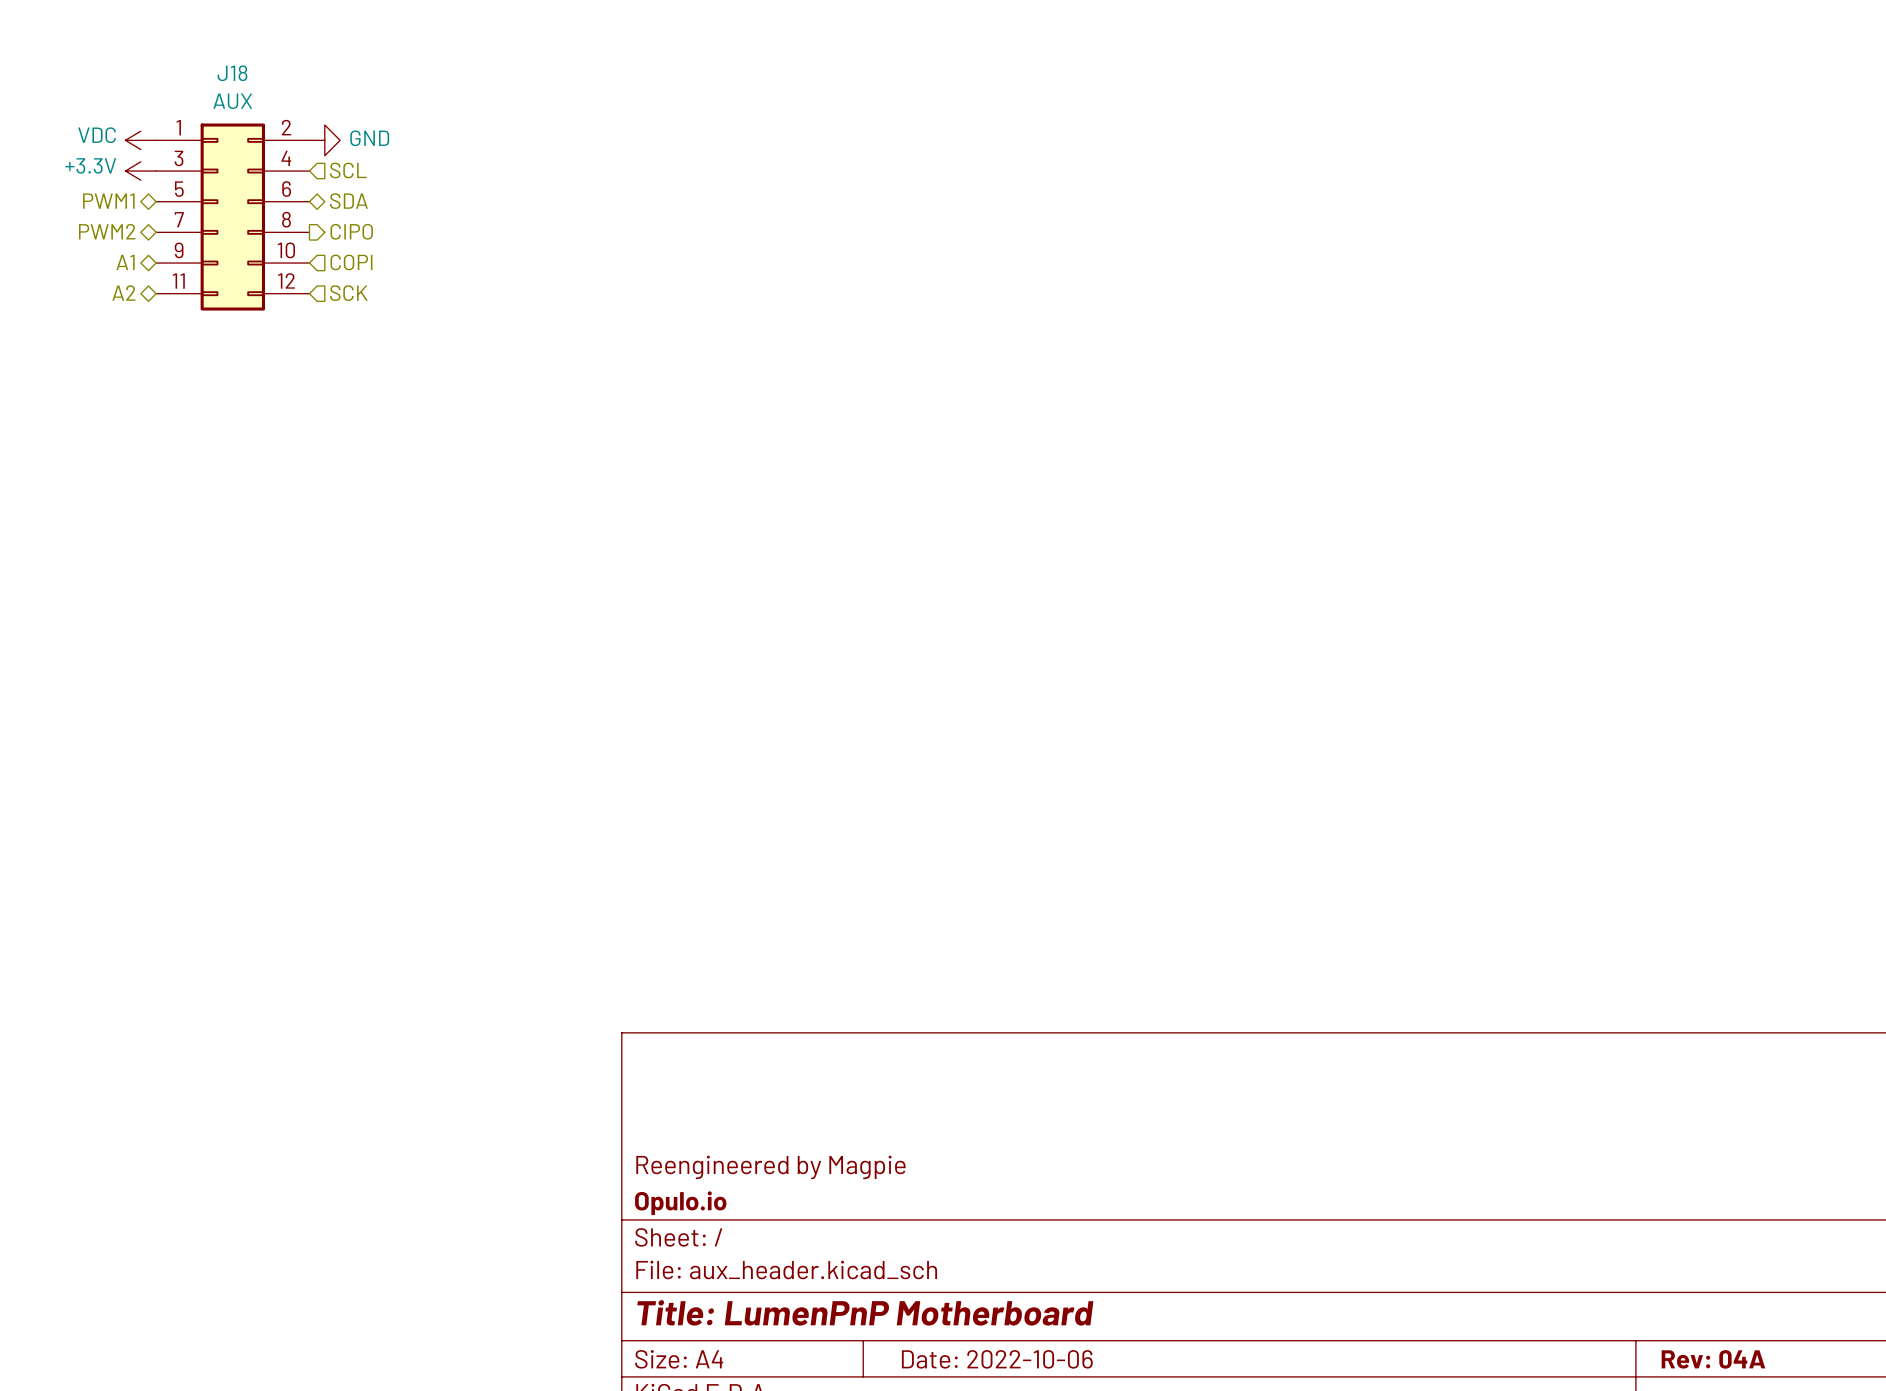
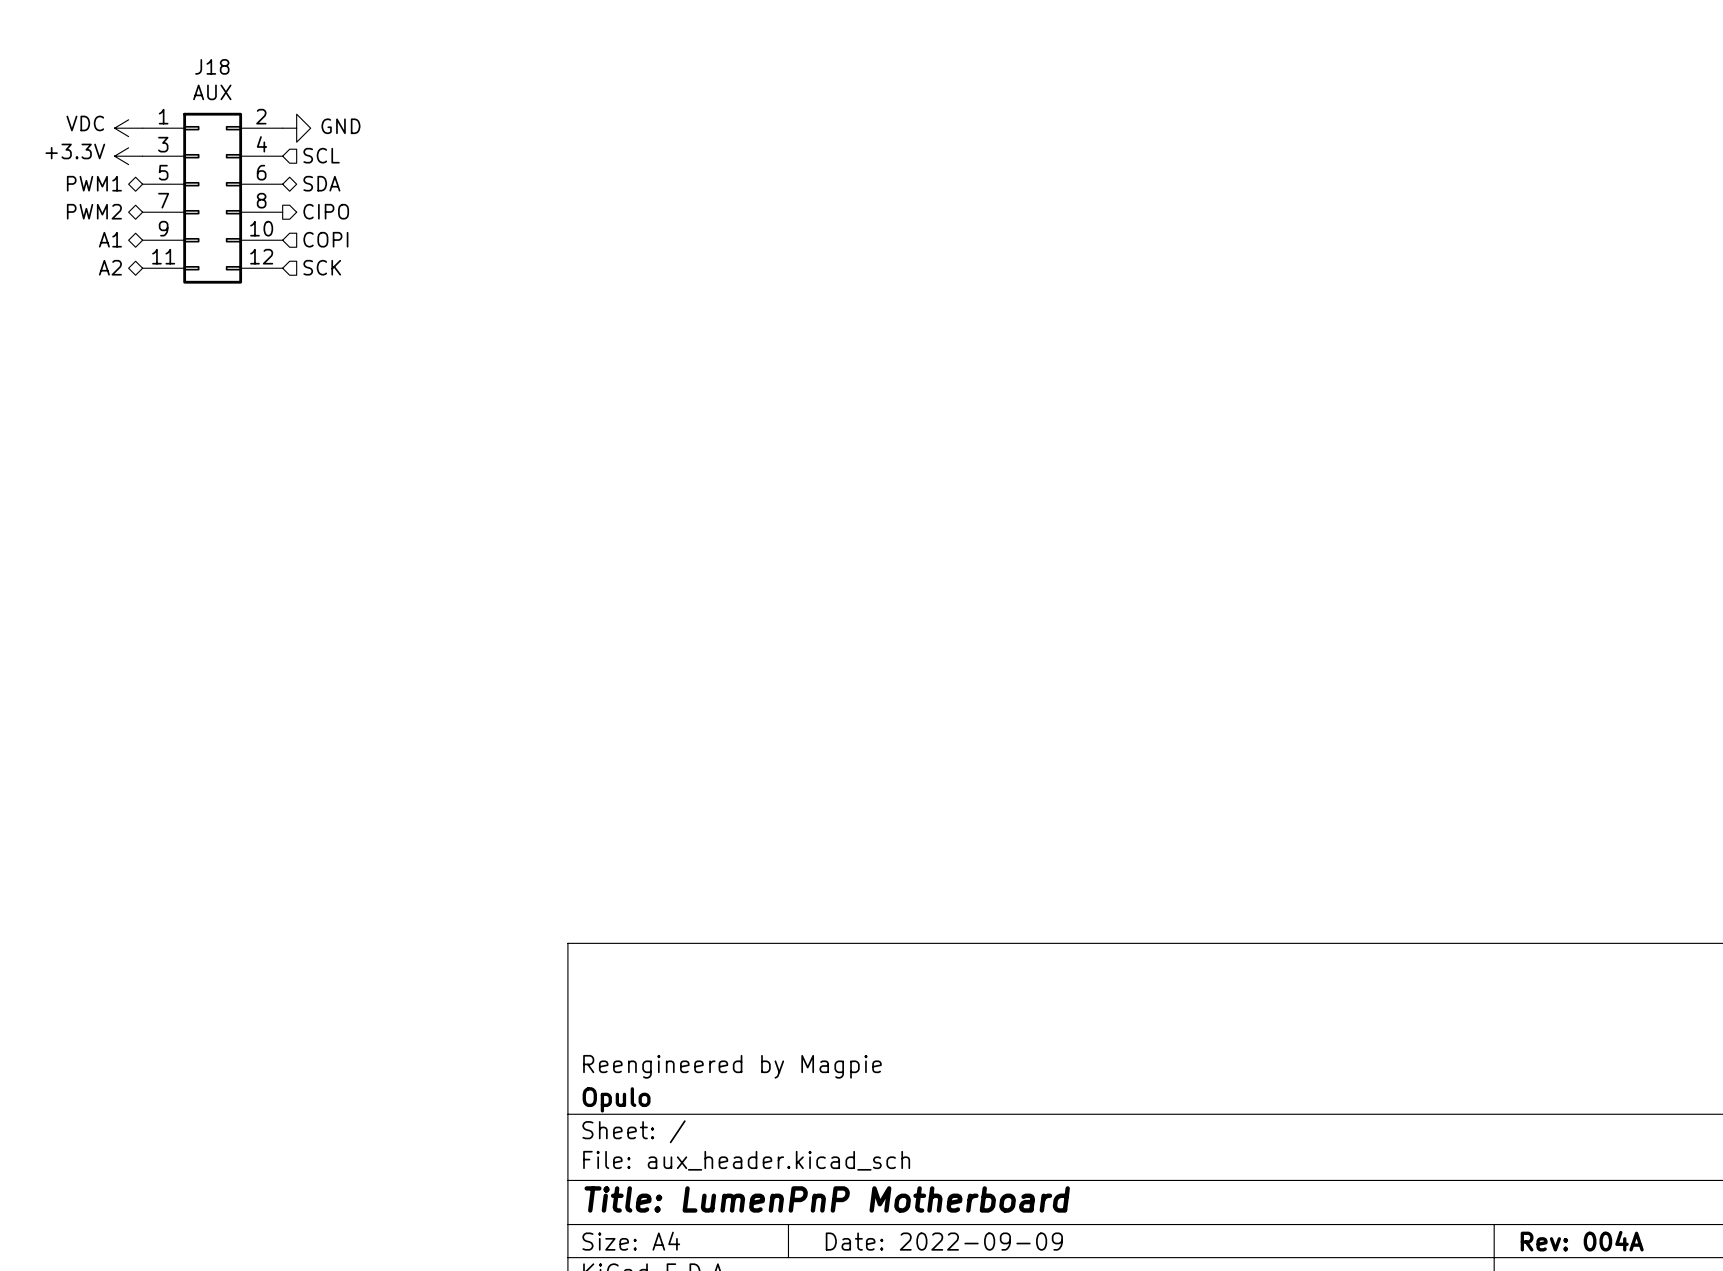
title block: Opulo.io (680, 1203) -> Opulo (616, 1099)
title block: Date: 2022-10-06 (997, 1359) -> Date: 2022-09-09 (944, 1241)
title block: Rev: 04A (1713, 1359) -> Rev: 004A (1582, 1241)

